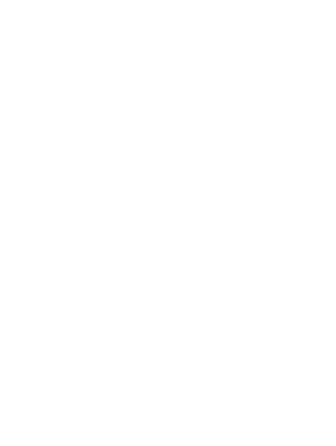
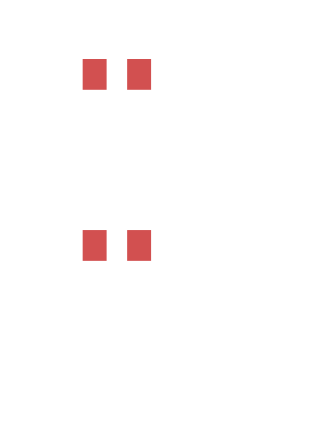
part: none -> (116, 74)
part: none -> (116, 245)

